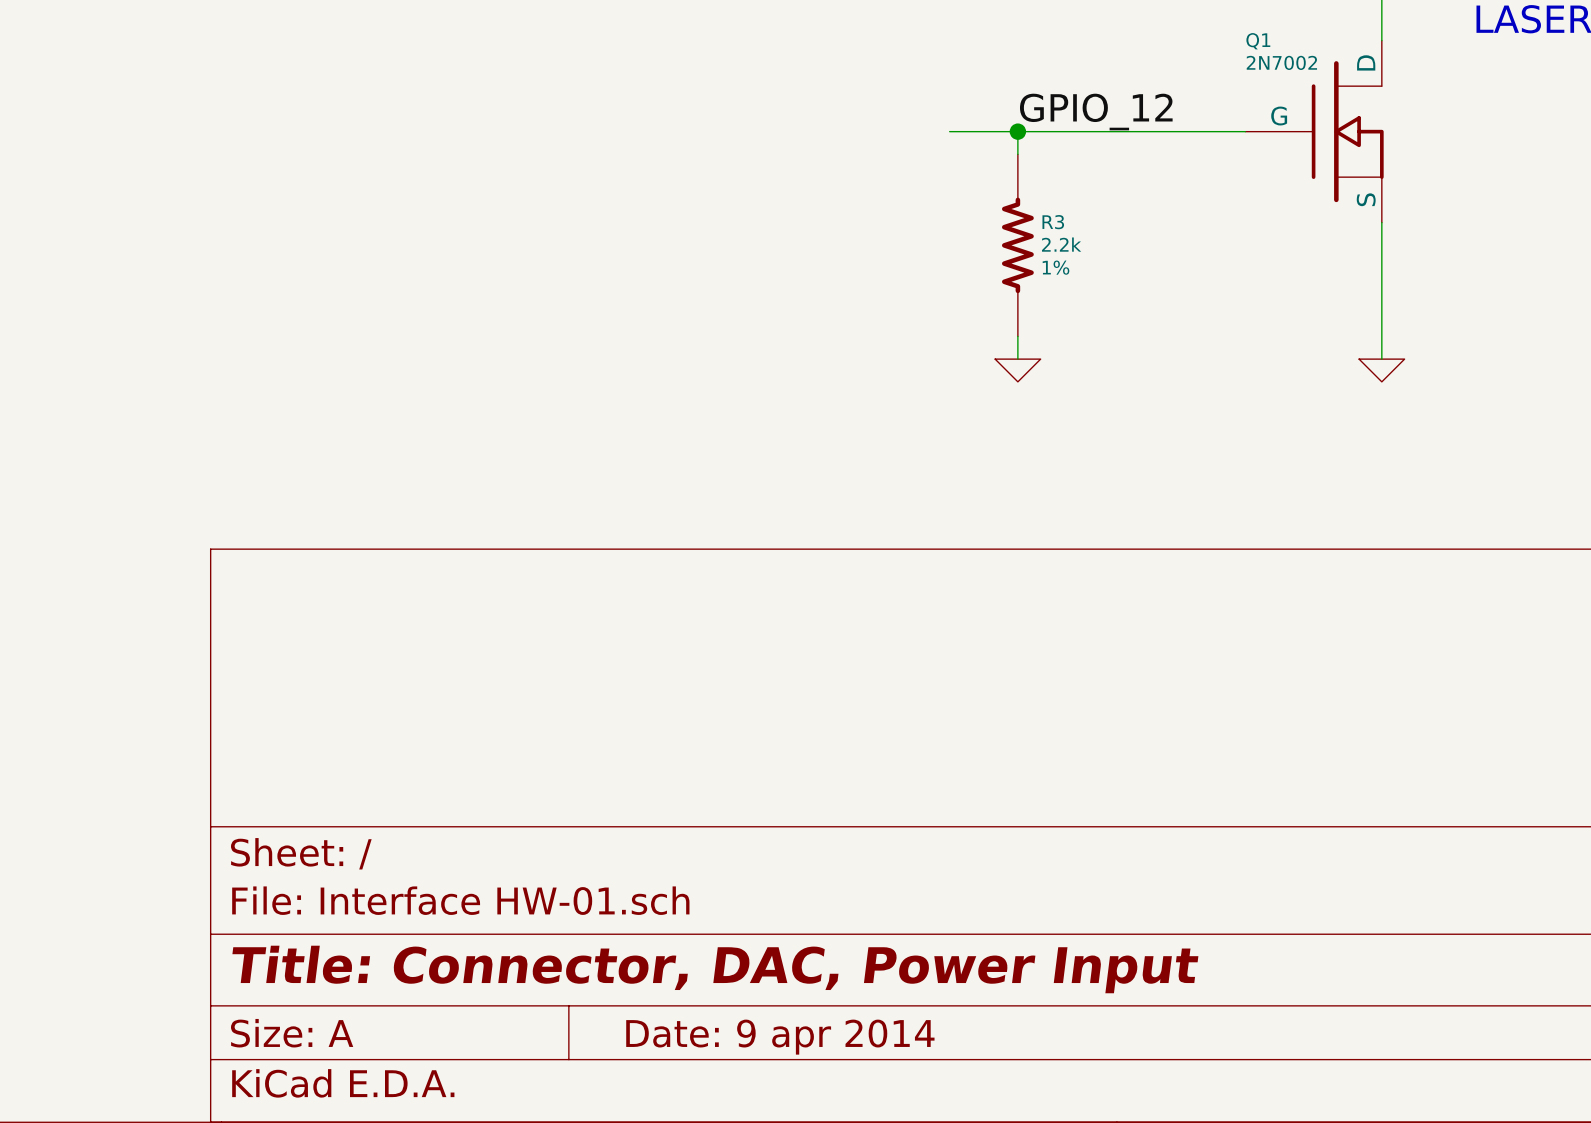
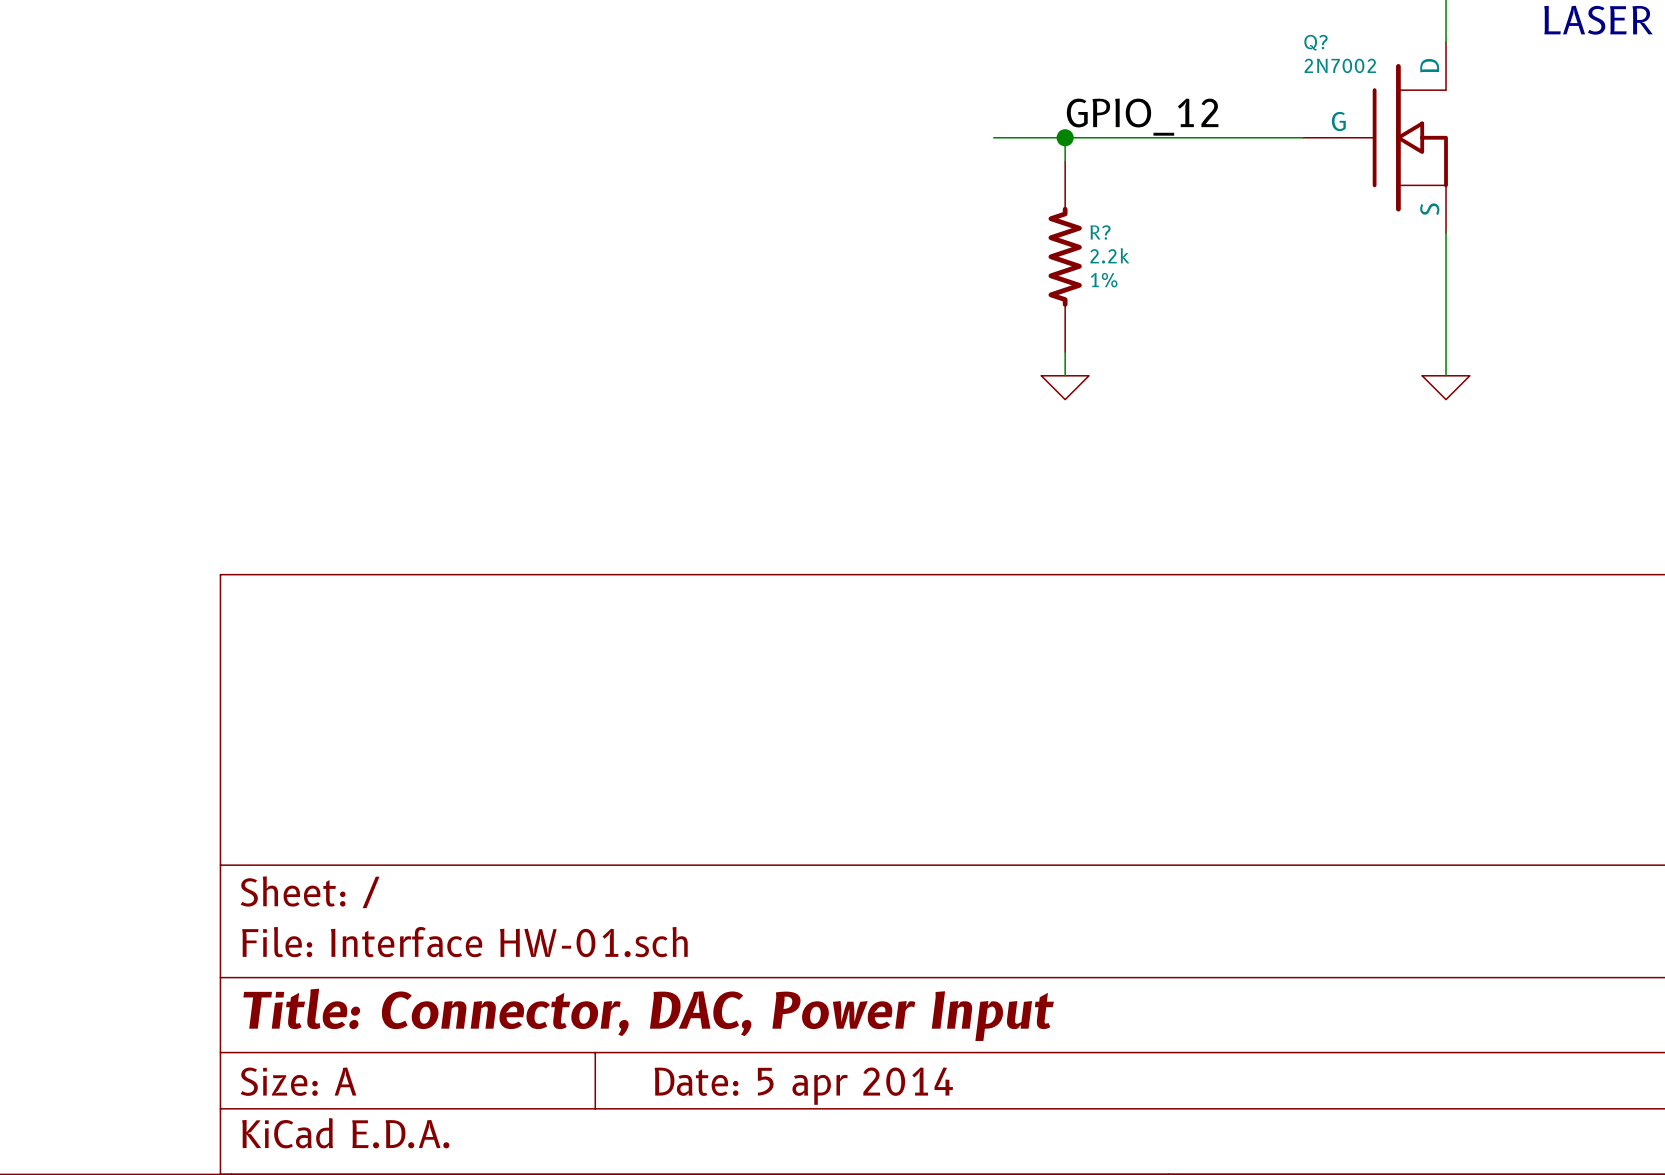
Q1 name: Q1 (1258, 41) -> Q? (1315, 42)
R3 name: R3 (1053, 222) -> R? (1100, 232)
title block: Date: 9 apr 2014 (780, 1037) -> Date: 5 apr 2014 (803, 1086)

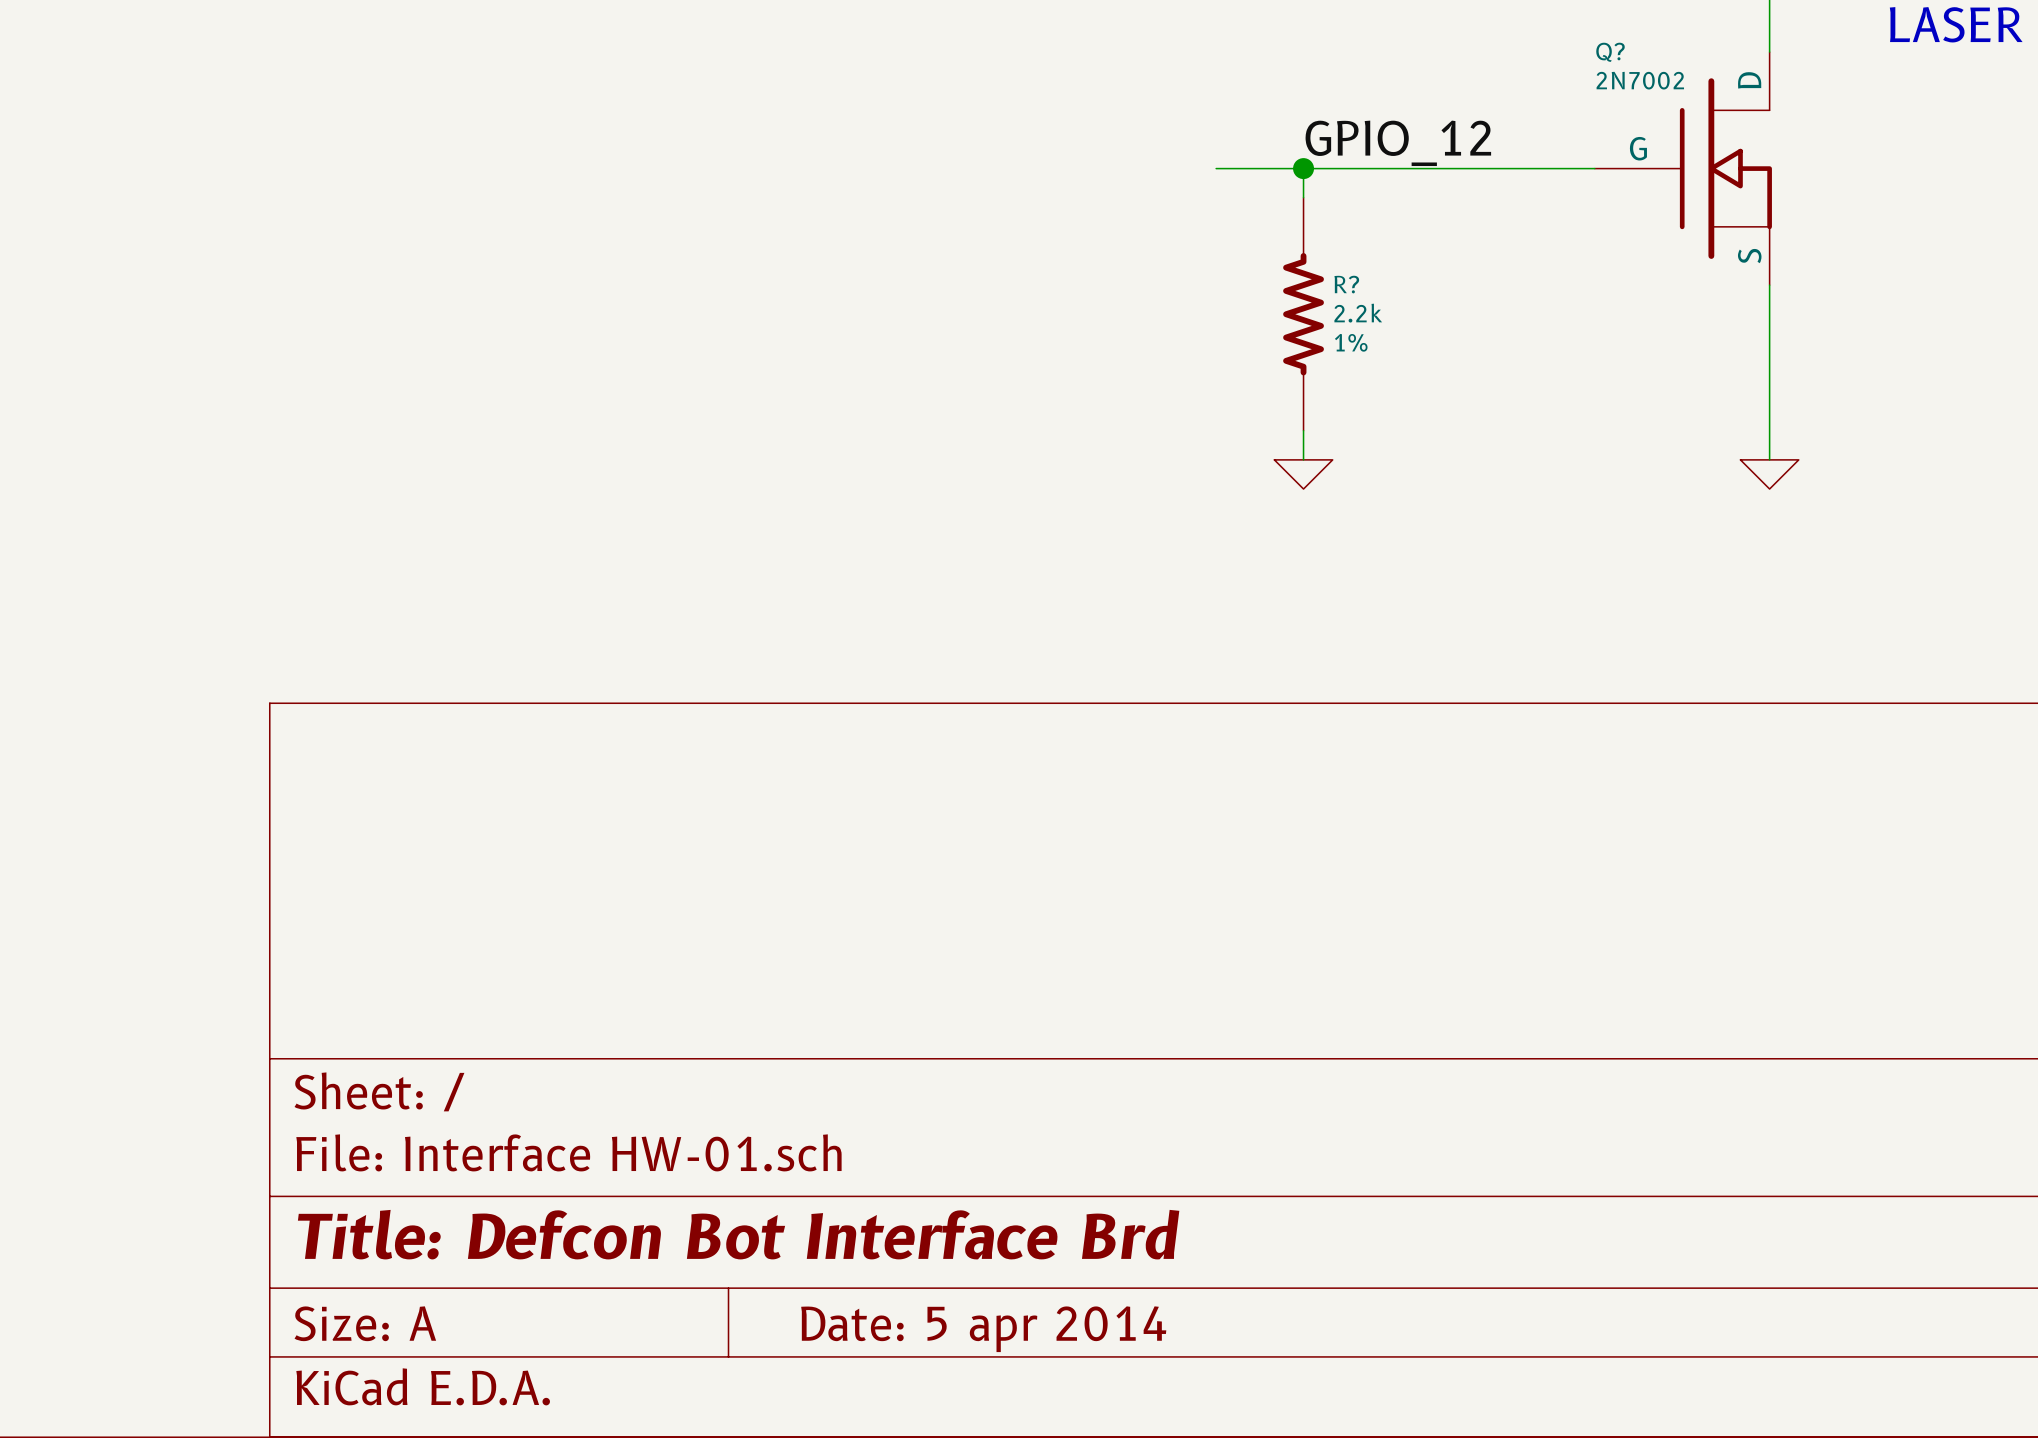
title block: Title: Connector, DAC, Power Input (648, 1014) -> Title: Defcon Bot Interface Brd (738, 1234)

